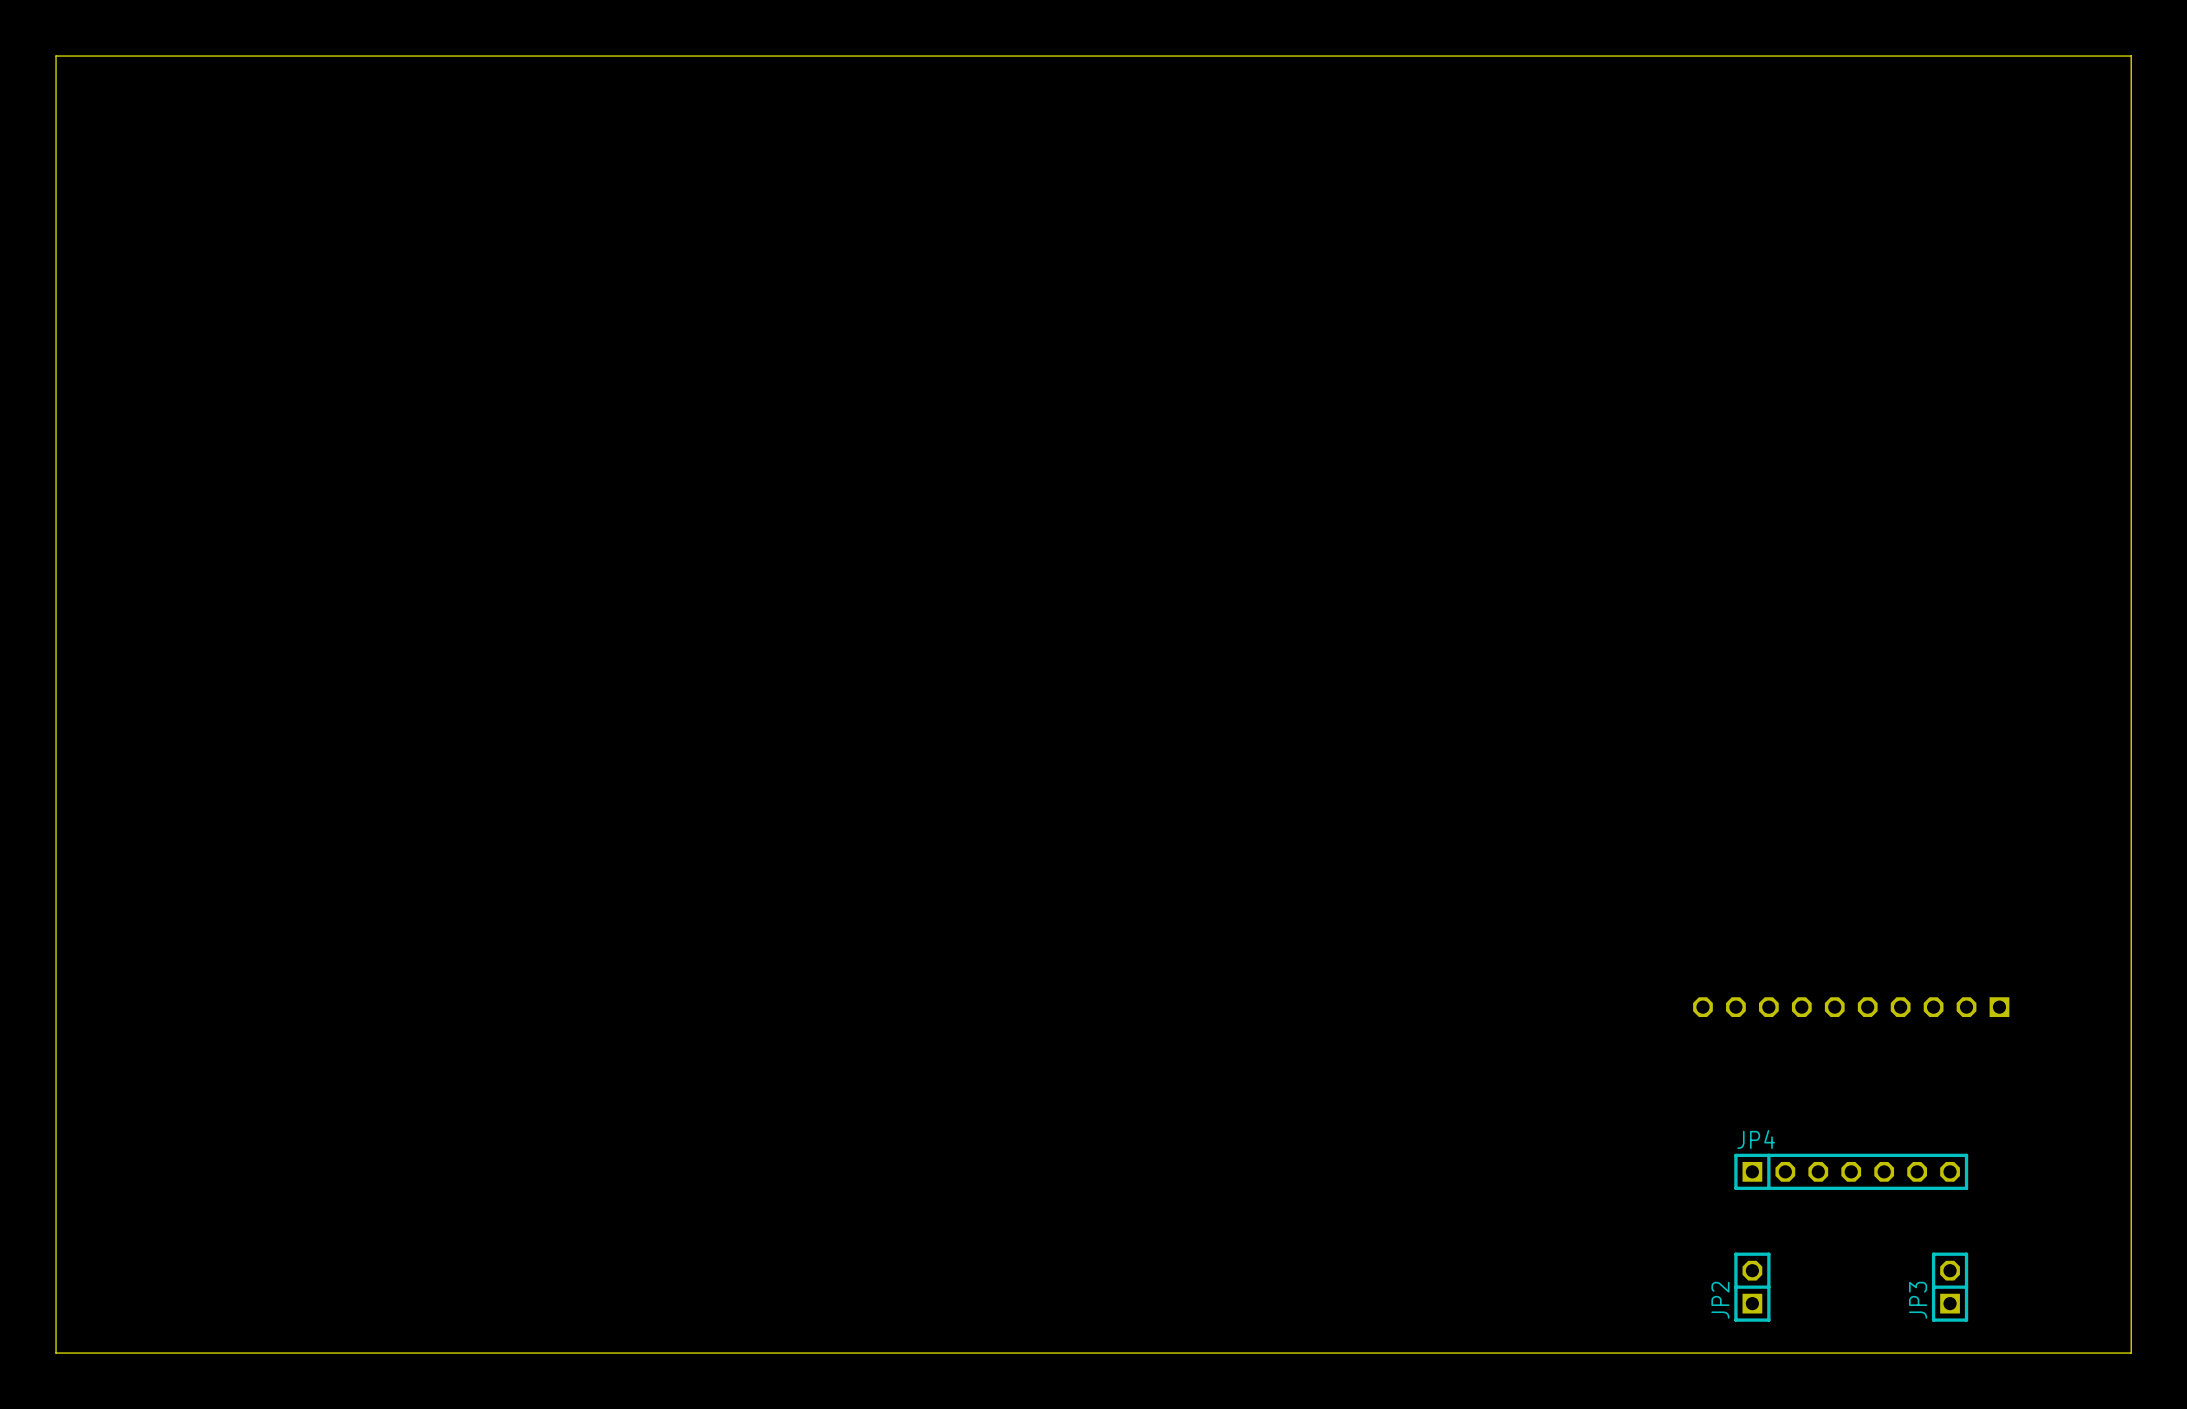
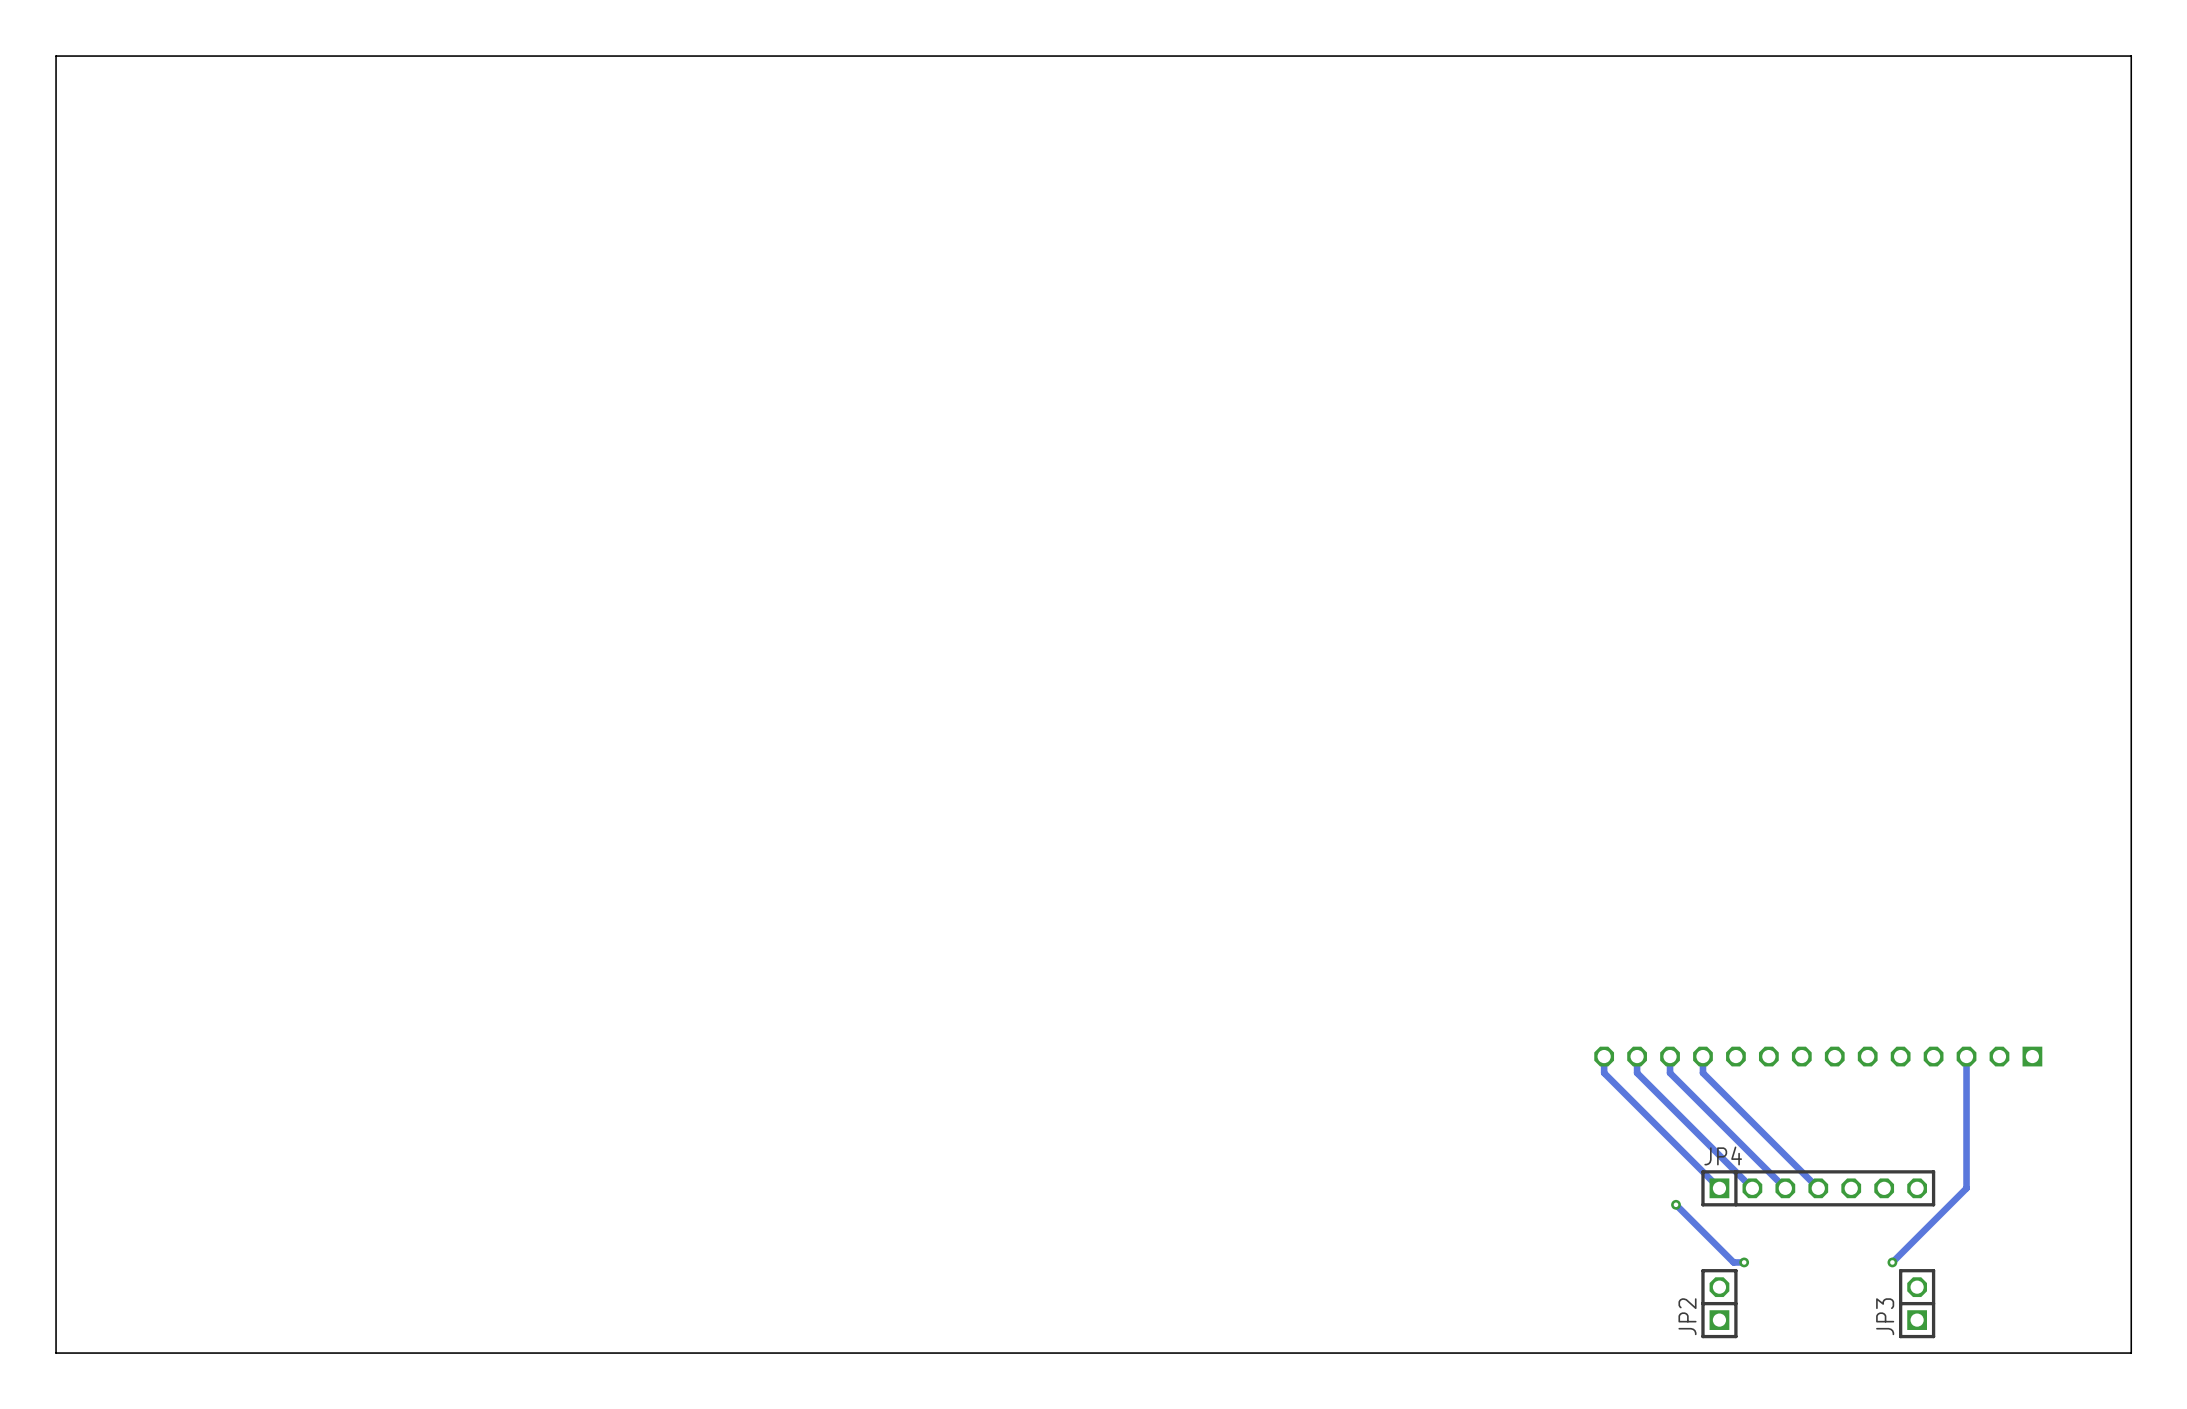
part: (1851, 1007) -> none
track: none -> (1604, 1056) (1604, 1073) (1719, 1188)
track: none -> (1637, 1056) (1637, 1073) (1752, 1188)
track: none -> (1670, 1056) (1670, 1073) (1785, 1188)
track: none -> (1702, 1056) (1702, 1073) (1818, 1188)
part: none -> (1818, 1056)
track: none -> (1966, 1056) (1966, 1188) (1892, 1262)
JP4 position: (1851, 1171) -> (1818, 1188)
track: none -> (1676, 1204) (1733, 1262) (1744, 1262)
via: none -> (1676, 1204)
via: none -> (1744, 1262)
via: none -> (1892, 1262)
JP2 position: (1752, 1287) -> (1719, 1303)
JP3 position: (1950, 1287) -> (1917, 1303)

